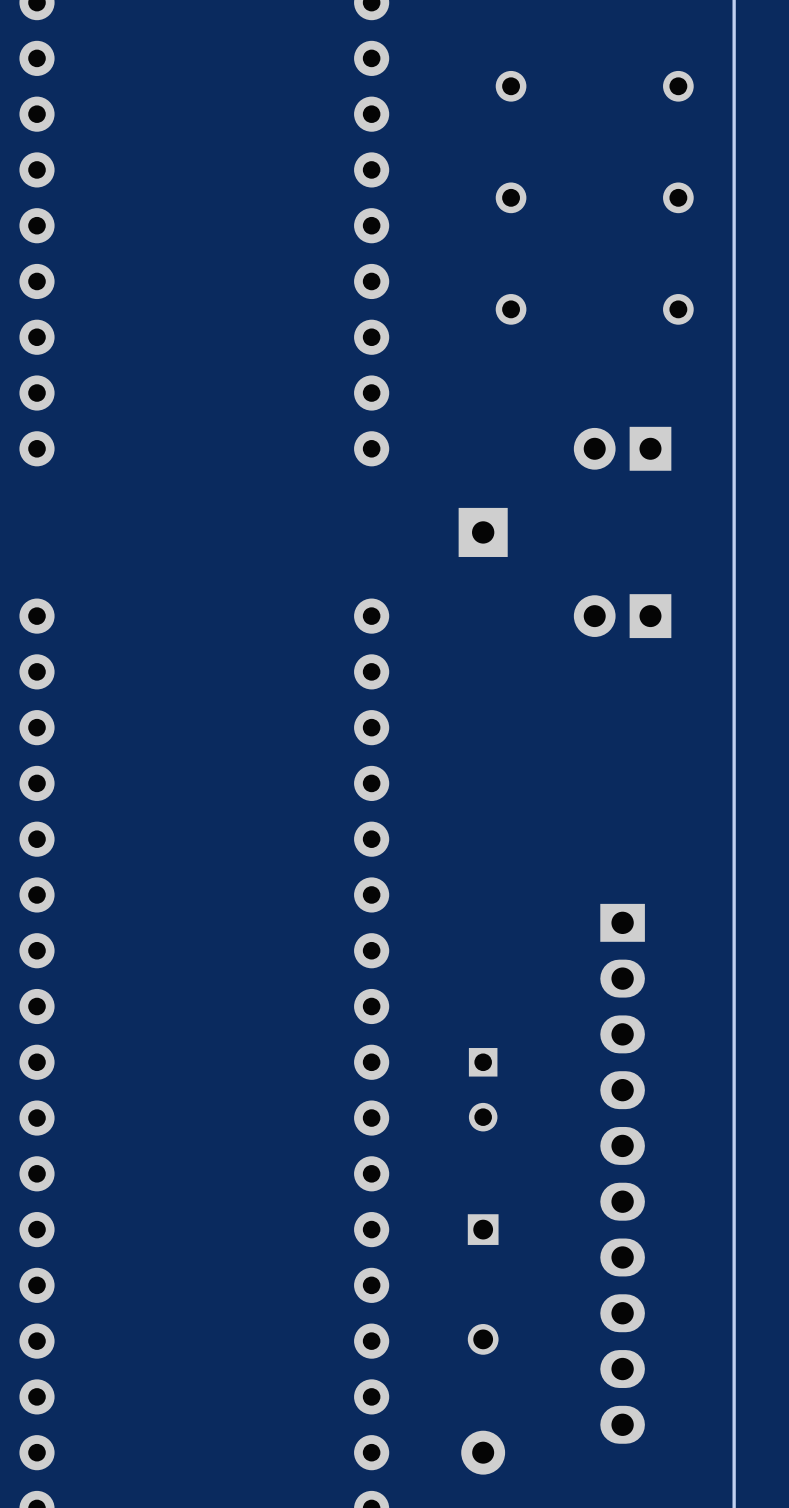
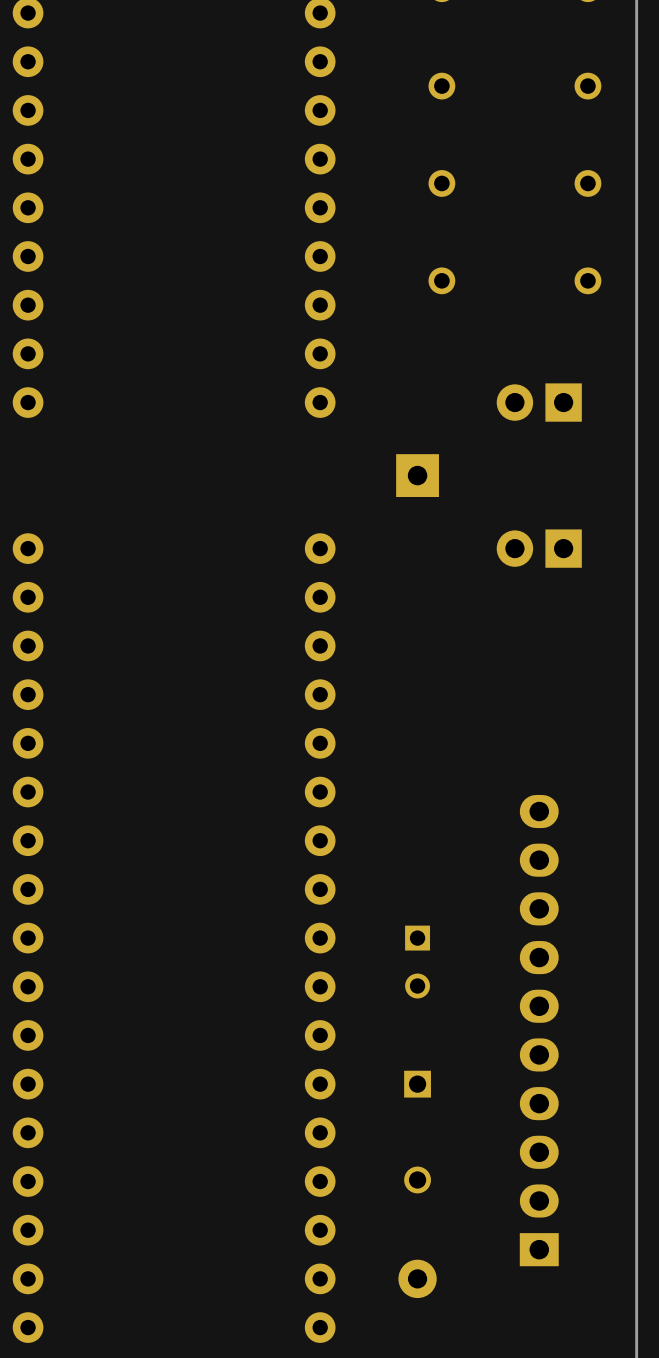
part rotation: 0° (622, 1173) -> 180° (539, 1030)

